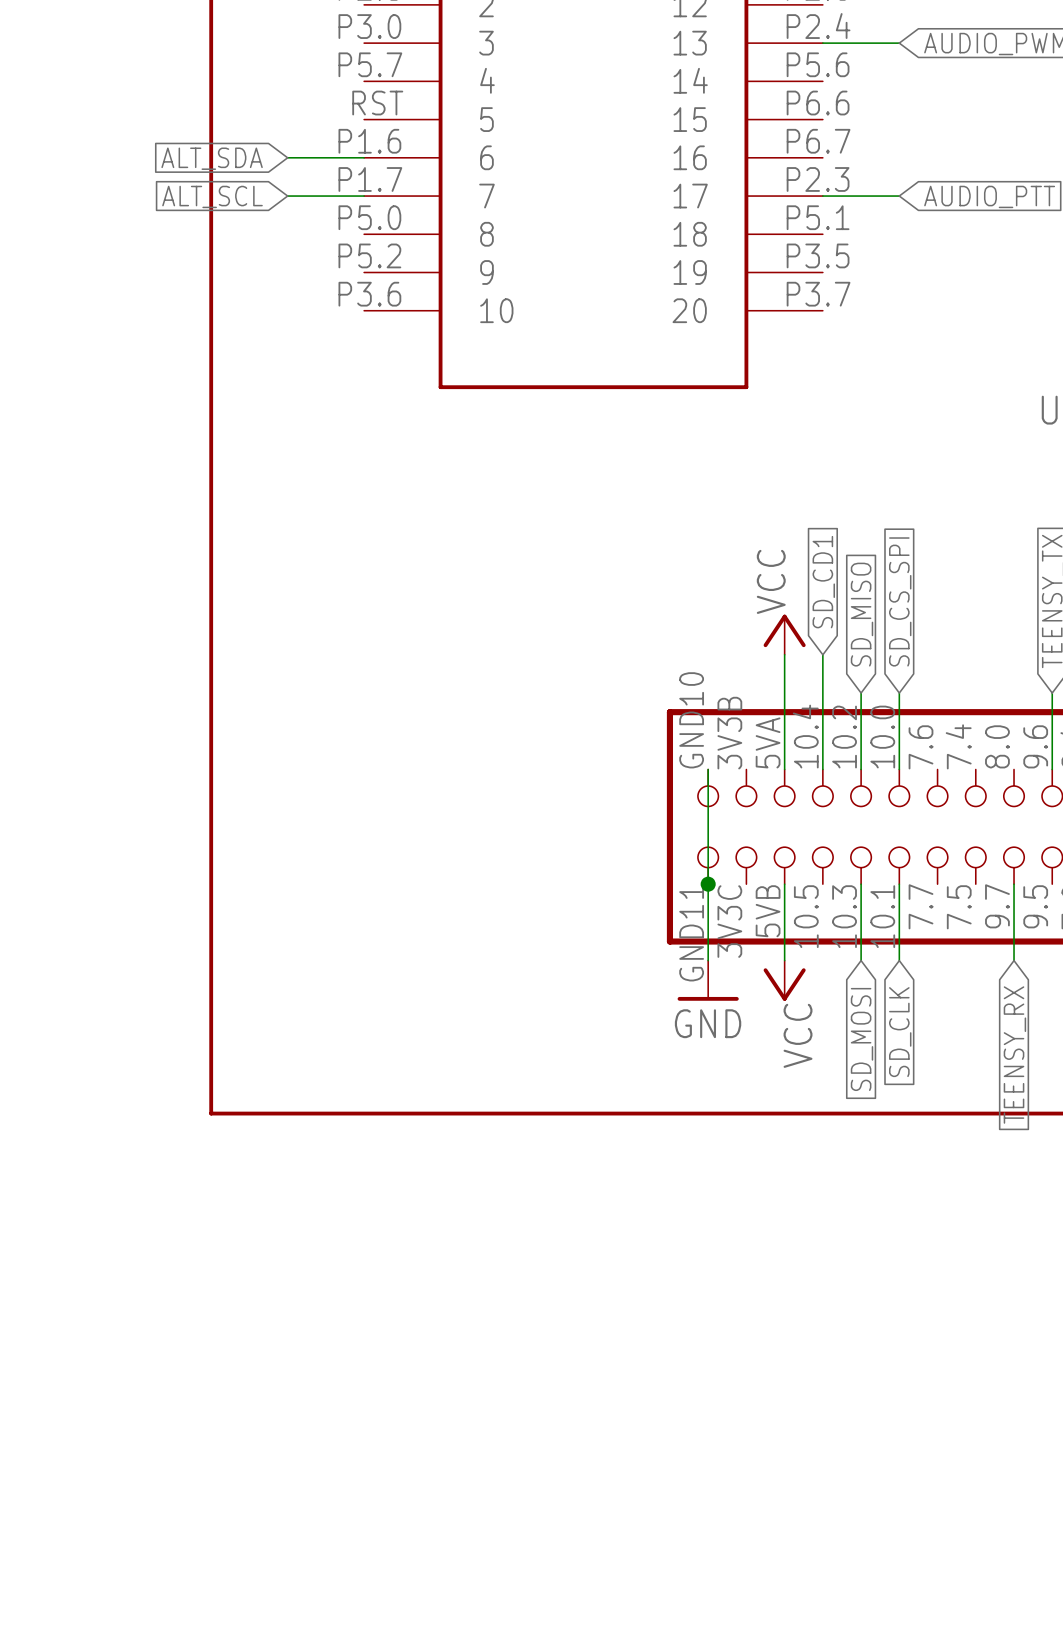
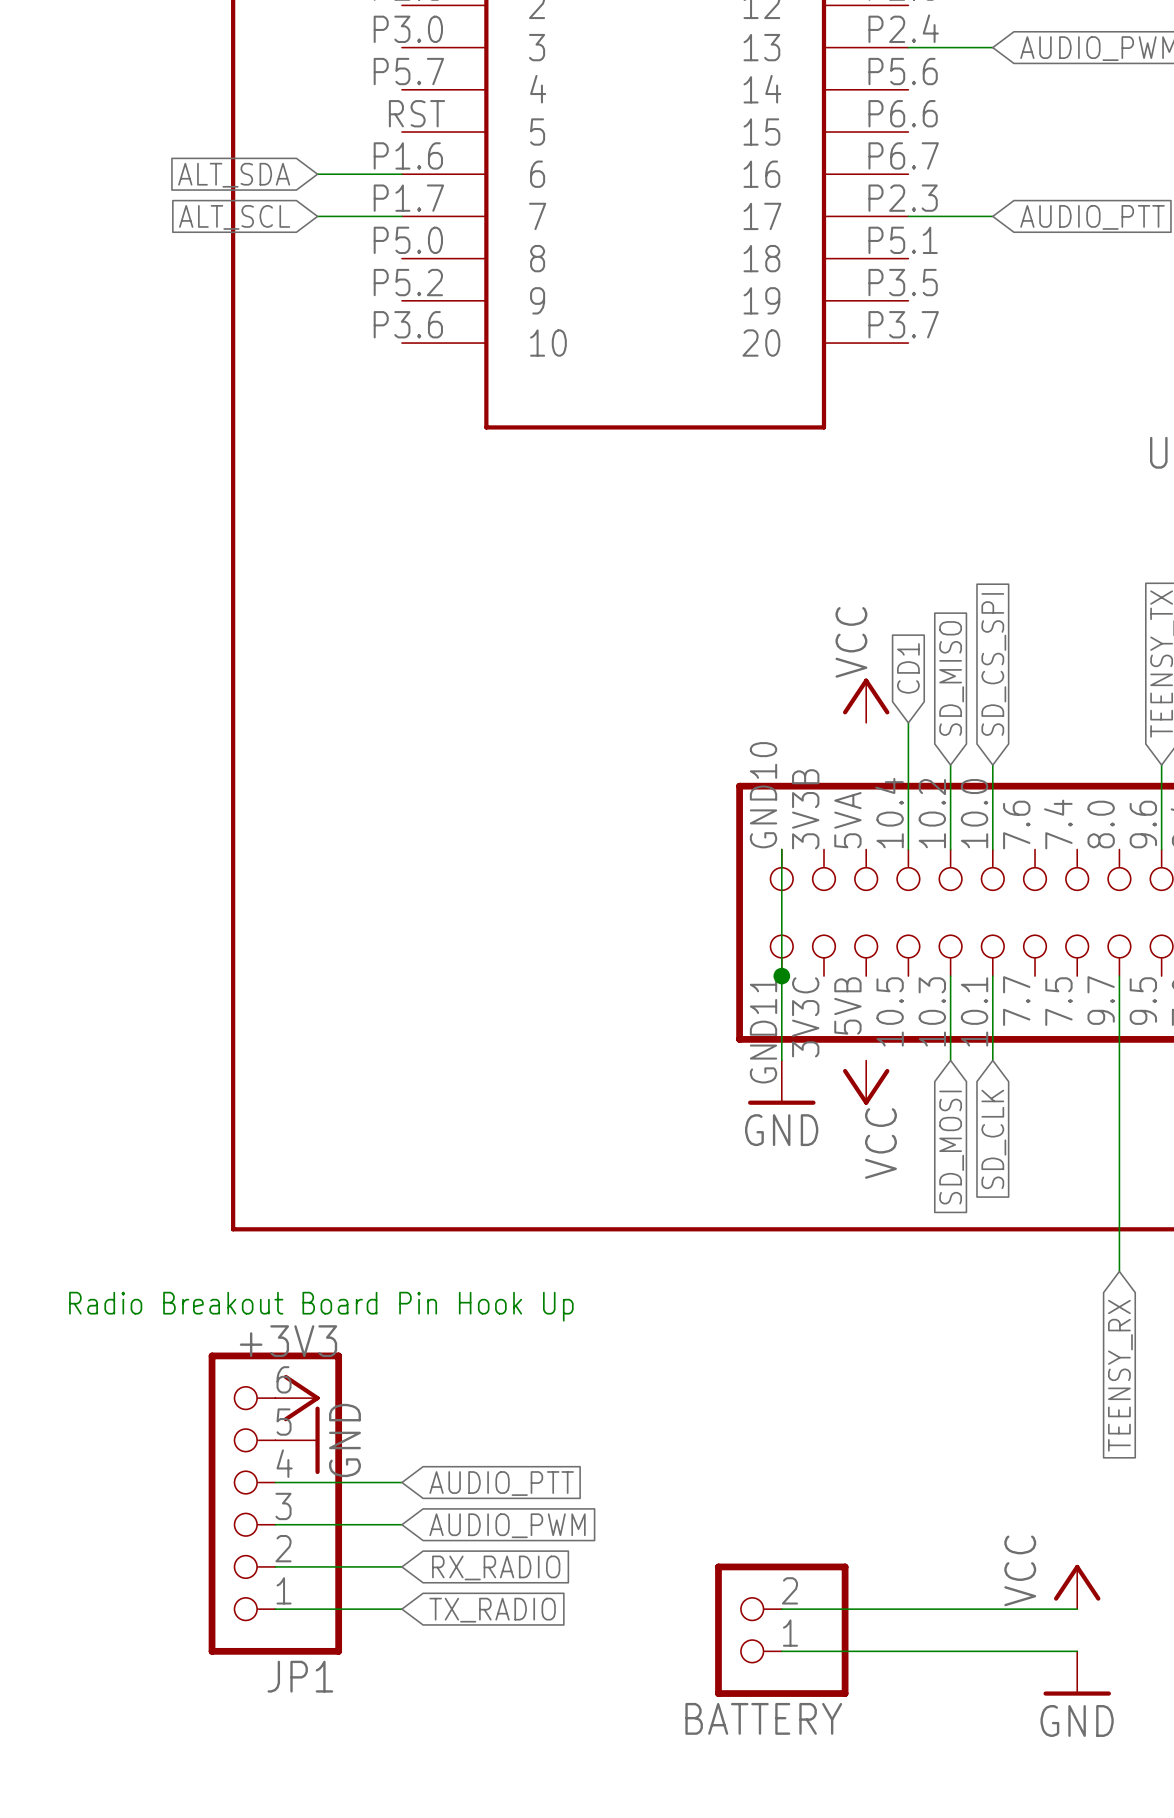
global label: SD_CD1 (823, 582) -> CD1 (908, 668)
wire: (784, 654) (784, 769) -> none
wire: (784, 884) (784, 960) -> none
wire: none -> (1119, 1060) (1119, 1271)
global label position: TEENSY_RX (1014, 1055) -> TEENSY_RX (1120, 1375)
text: none -> Radio Breakout Board Pin Hook Up (321, 1306)
power symbol: none -> +3V3 (297, 1398)
power symbol: none -> GND (297, 1440)
wire: none -> (275, 1482) (401, 1482)
global label: none -> AUDIO_PTT (501, 1483)
JP1: none -> (275, 1503)
wire: none -> (275, 1524) (401, 1524)
global label: none -> AUDIO_PWM (507, 1525)
wire: none -> (275, 1566) (401, 1566)
global label: none -> RX_RADIO (496, 1567)
power symbol: none -> VCC (1077, 1586)
wire: none -> (275, 1609) (401, 1609)
wire: none -> (781, 1609) (1077, 1609)
global label: none -> TX_RADIO (492, 1610)
BATTERY: none -> (781, 1630)
wire: none -> (781, 1651) (1077, 1651)
power symbol: none -> GND (1077, 1673)

